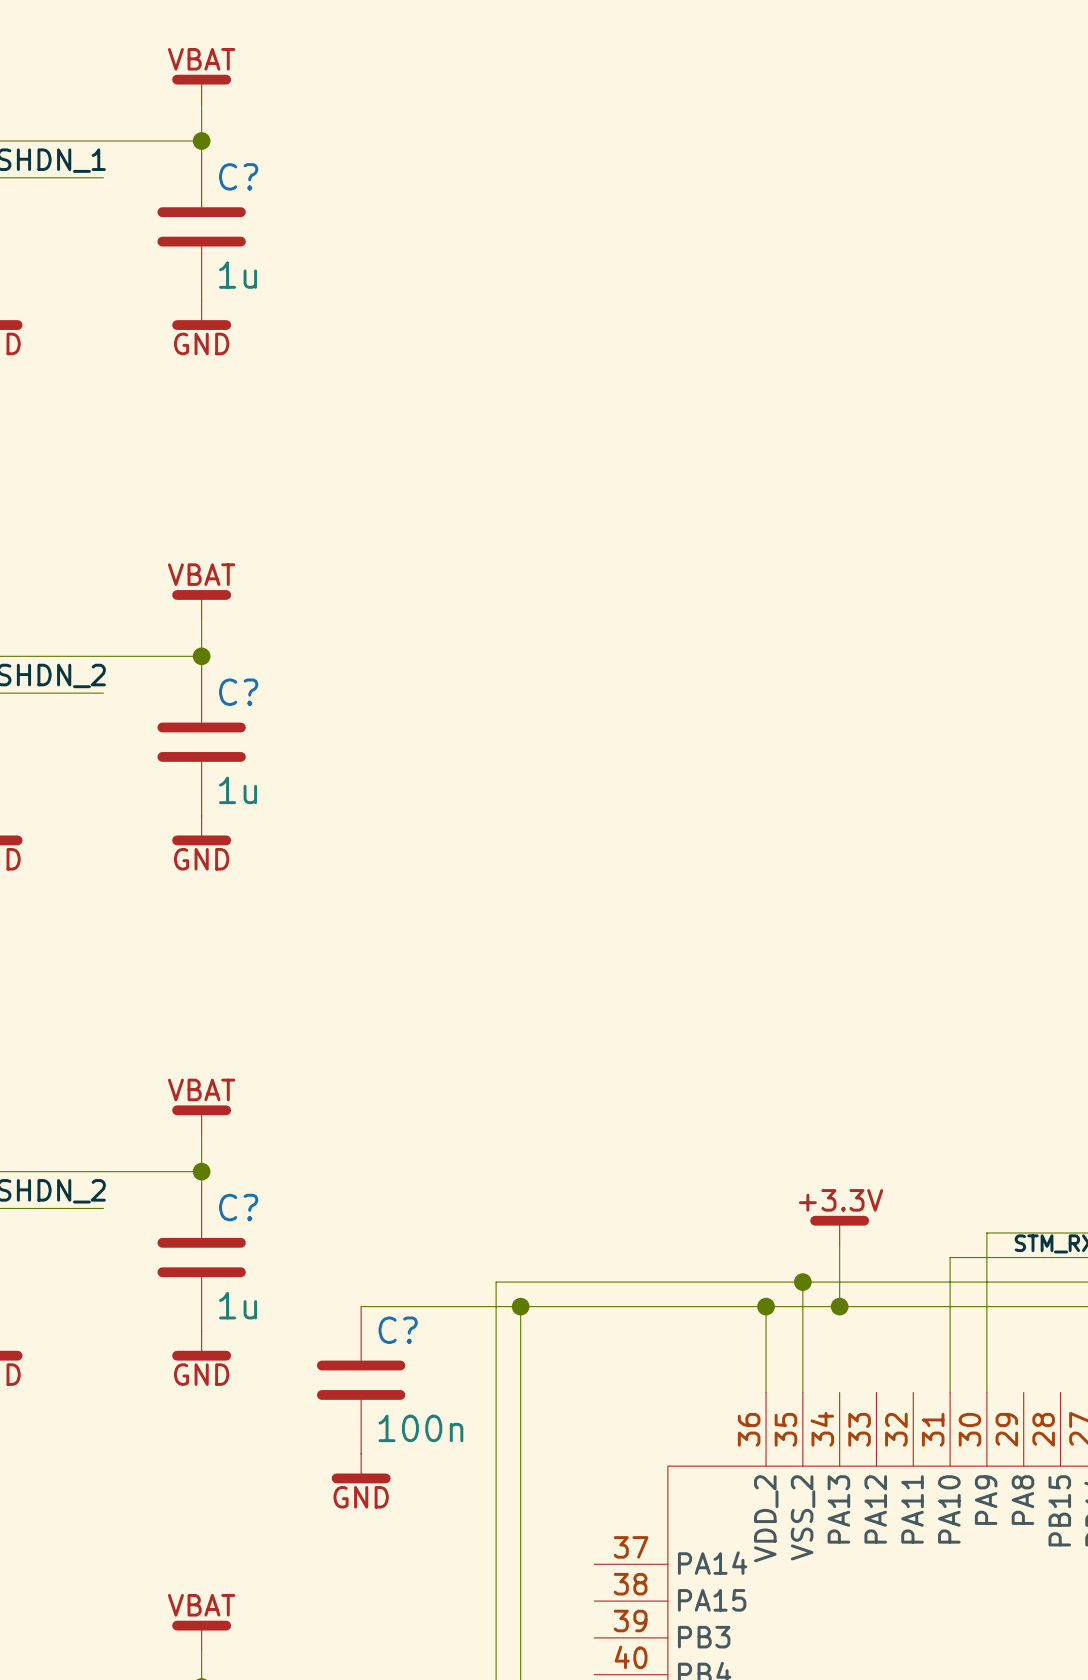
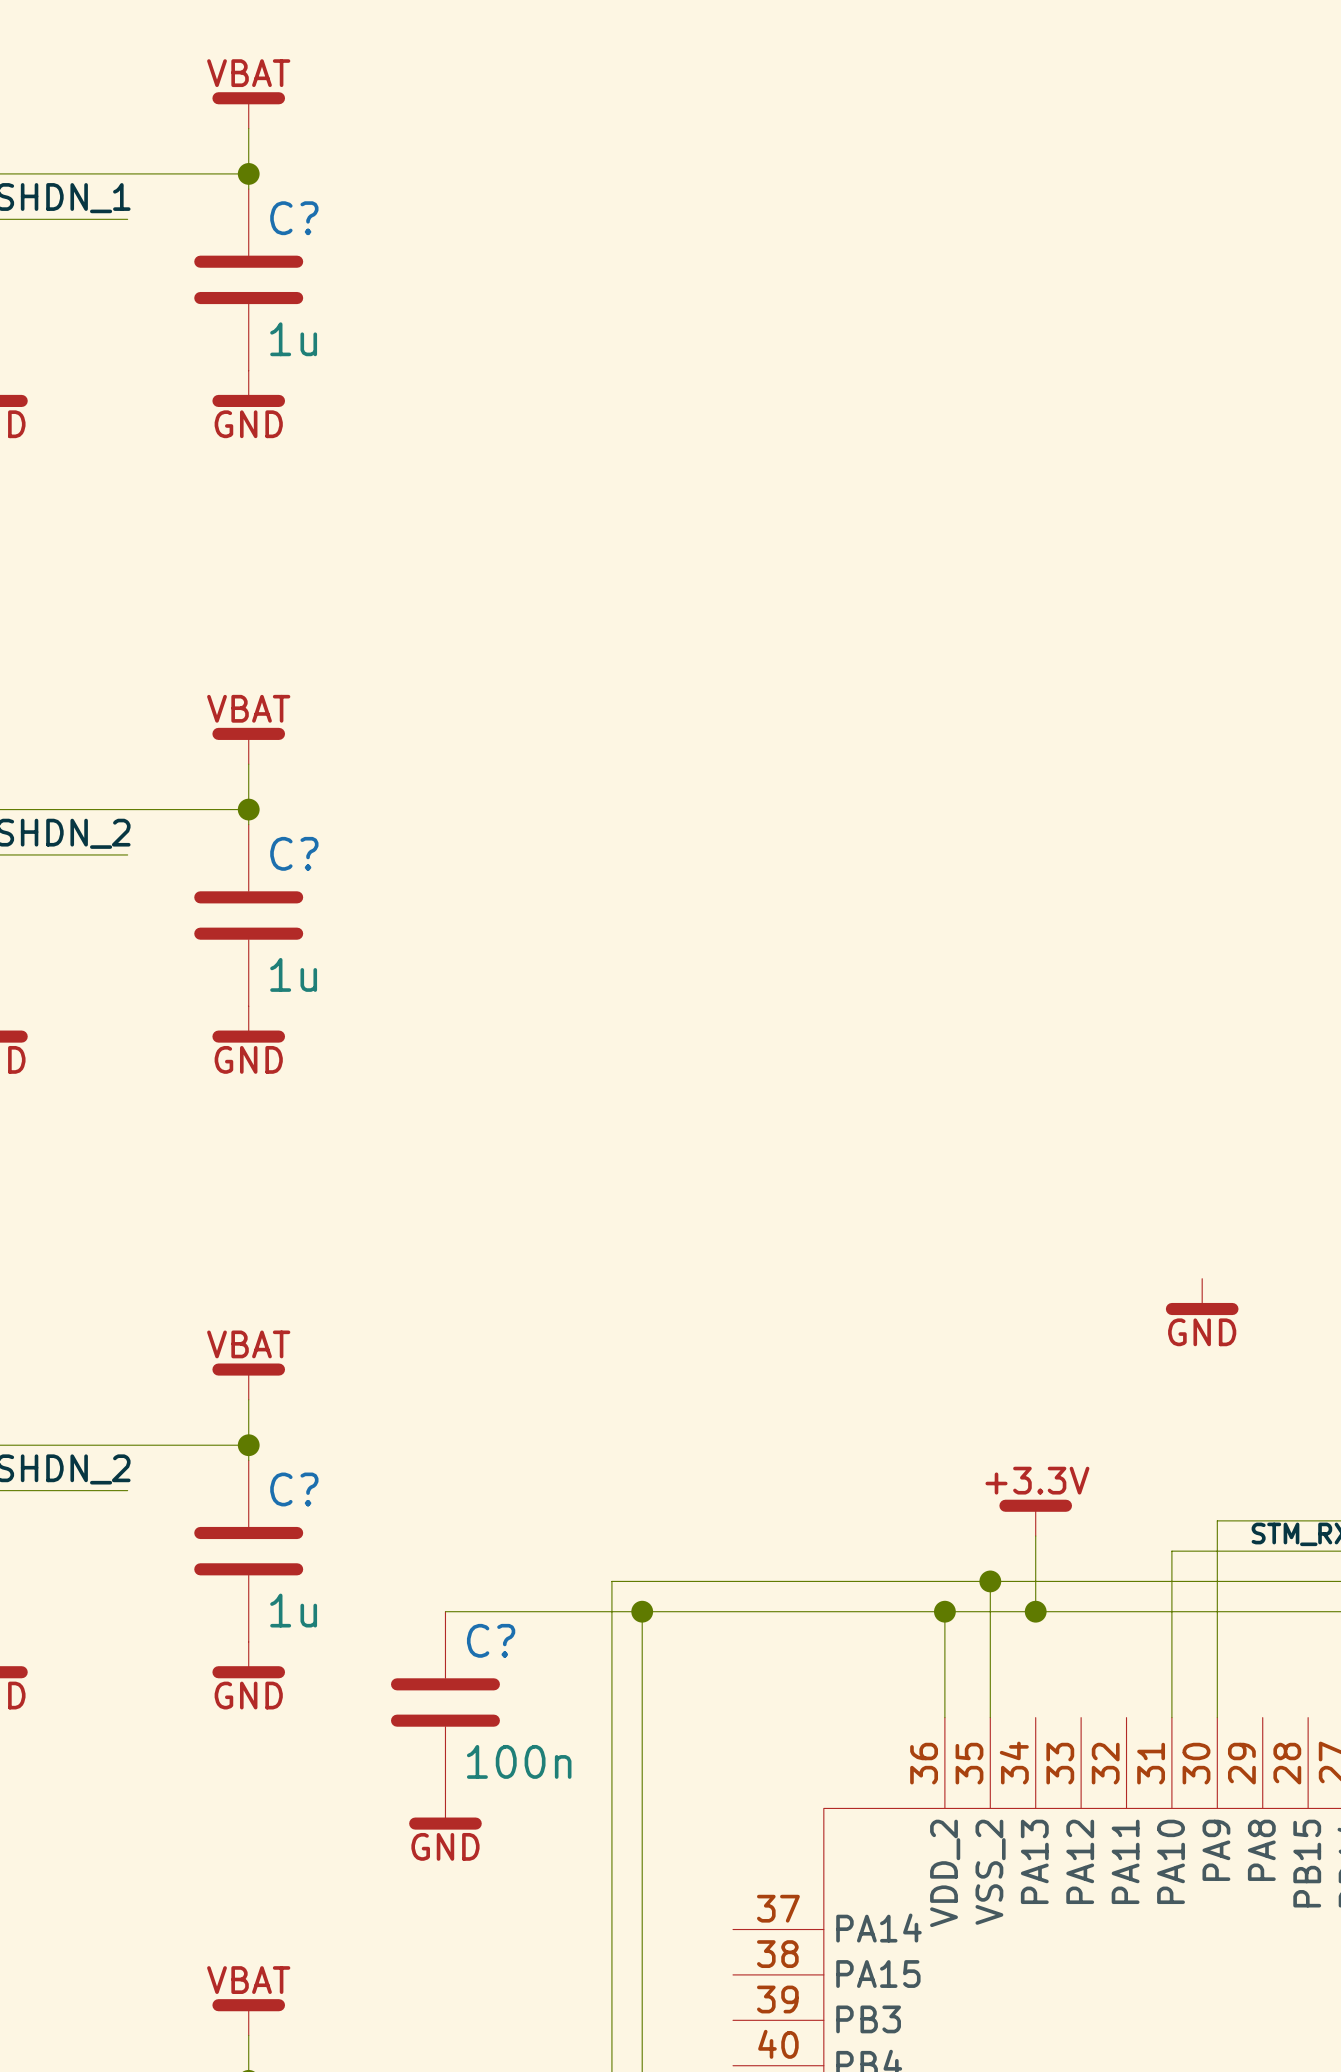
power symbol: none -> (1202, 1296)

